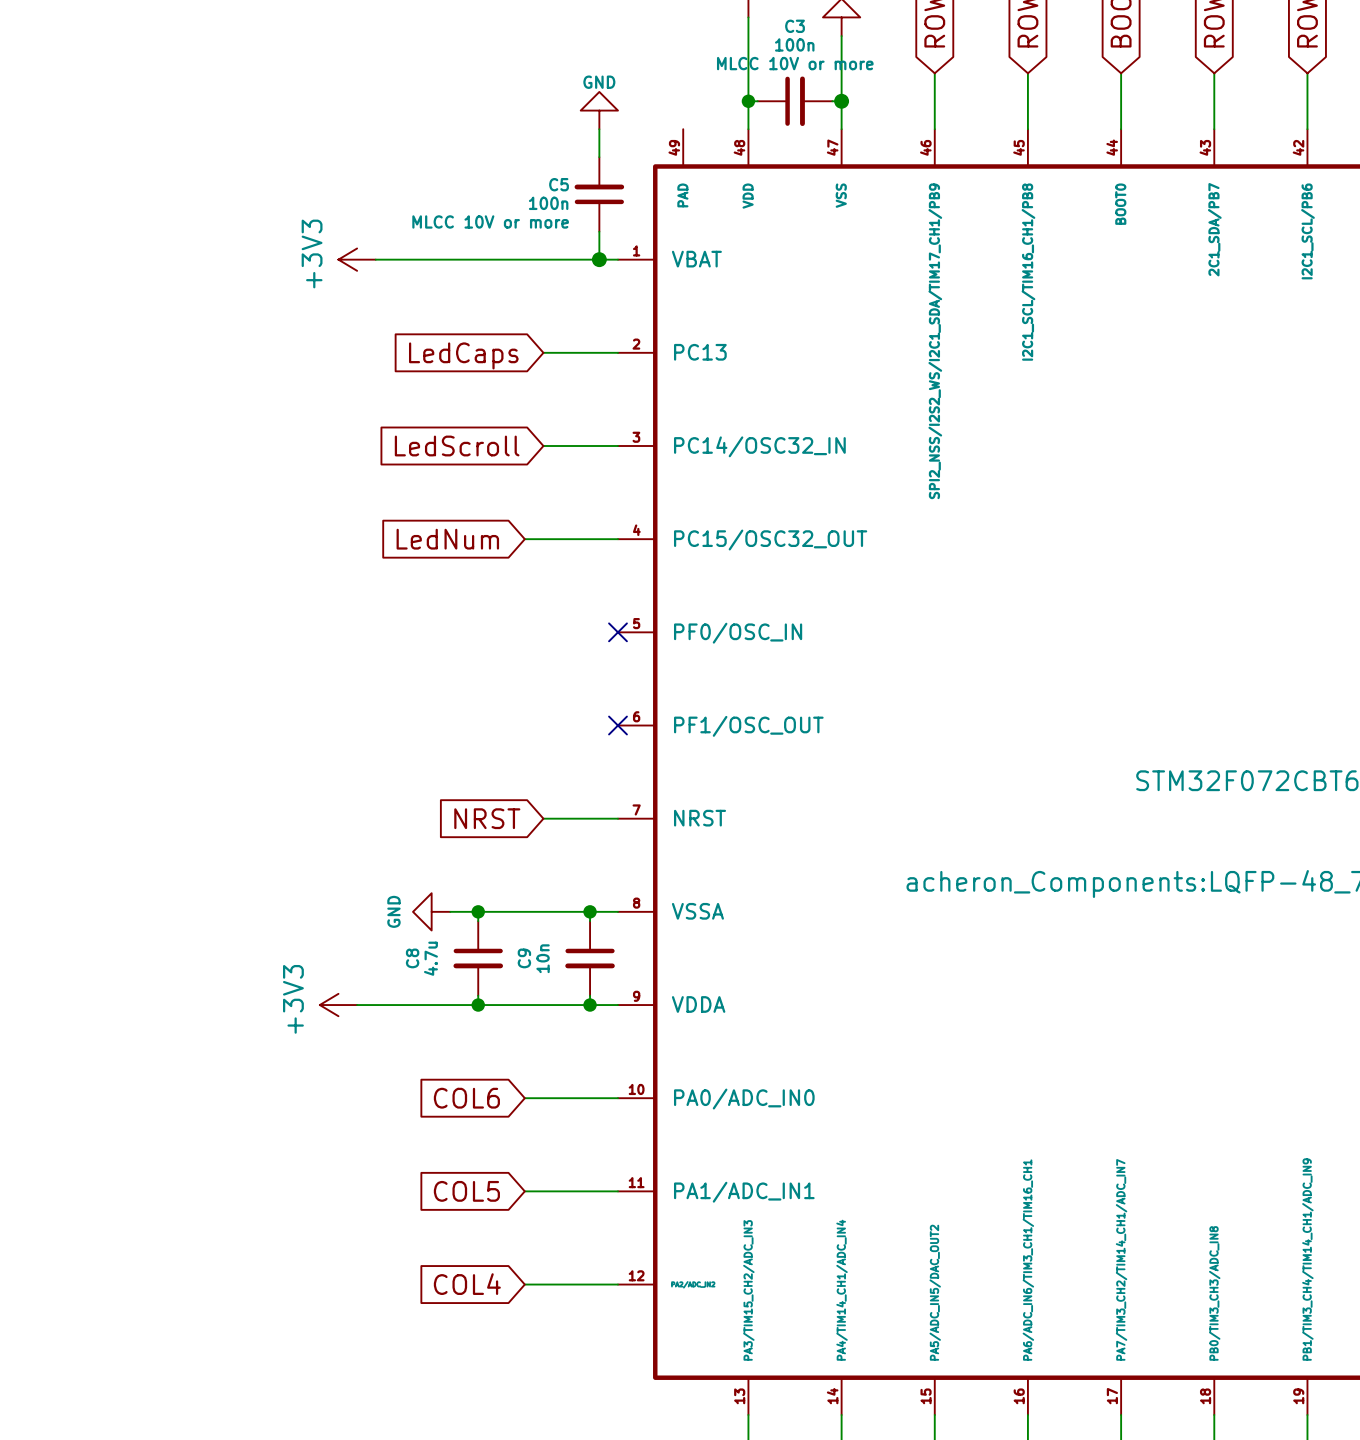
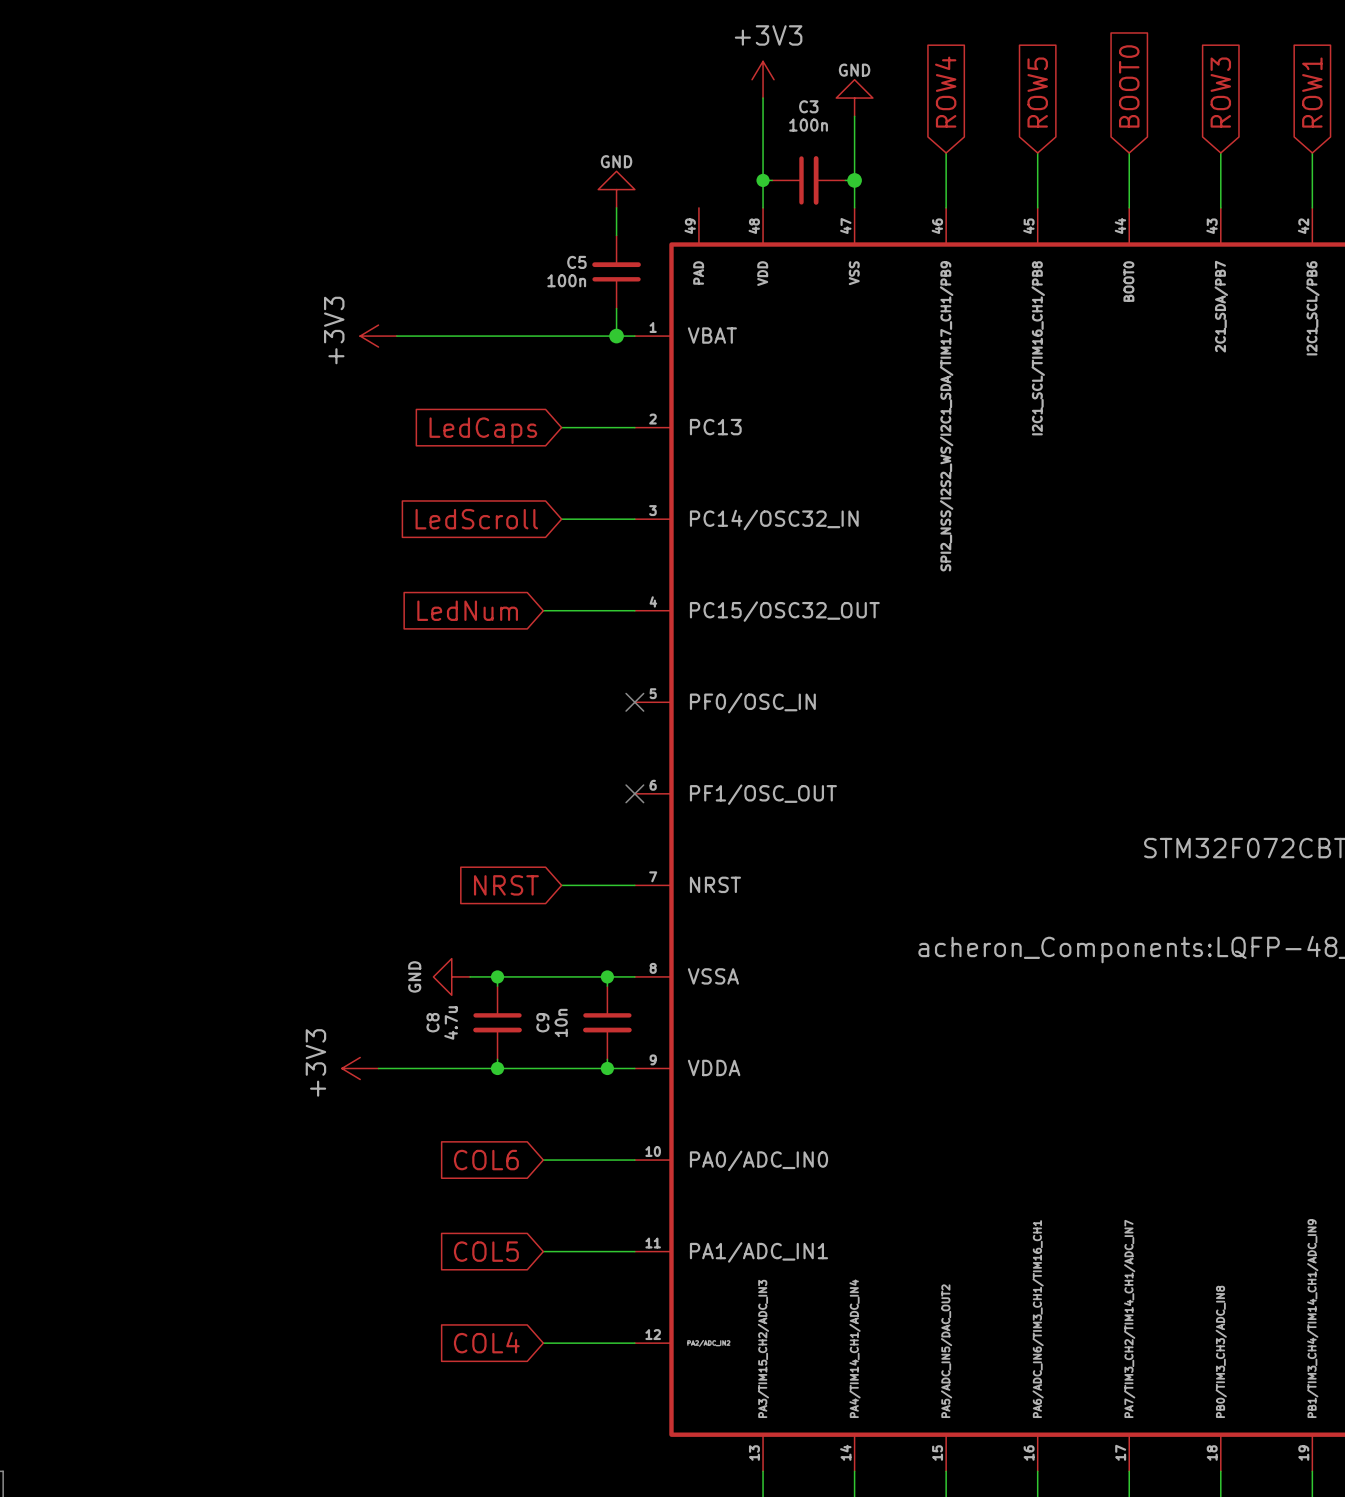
C3 text: MLCC 10V or more (795, 63) -> none
C5 text: MLCC 10V or more (490, 221) -> none

